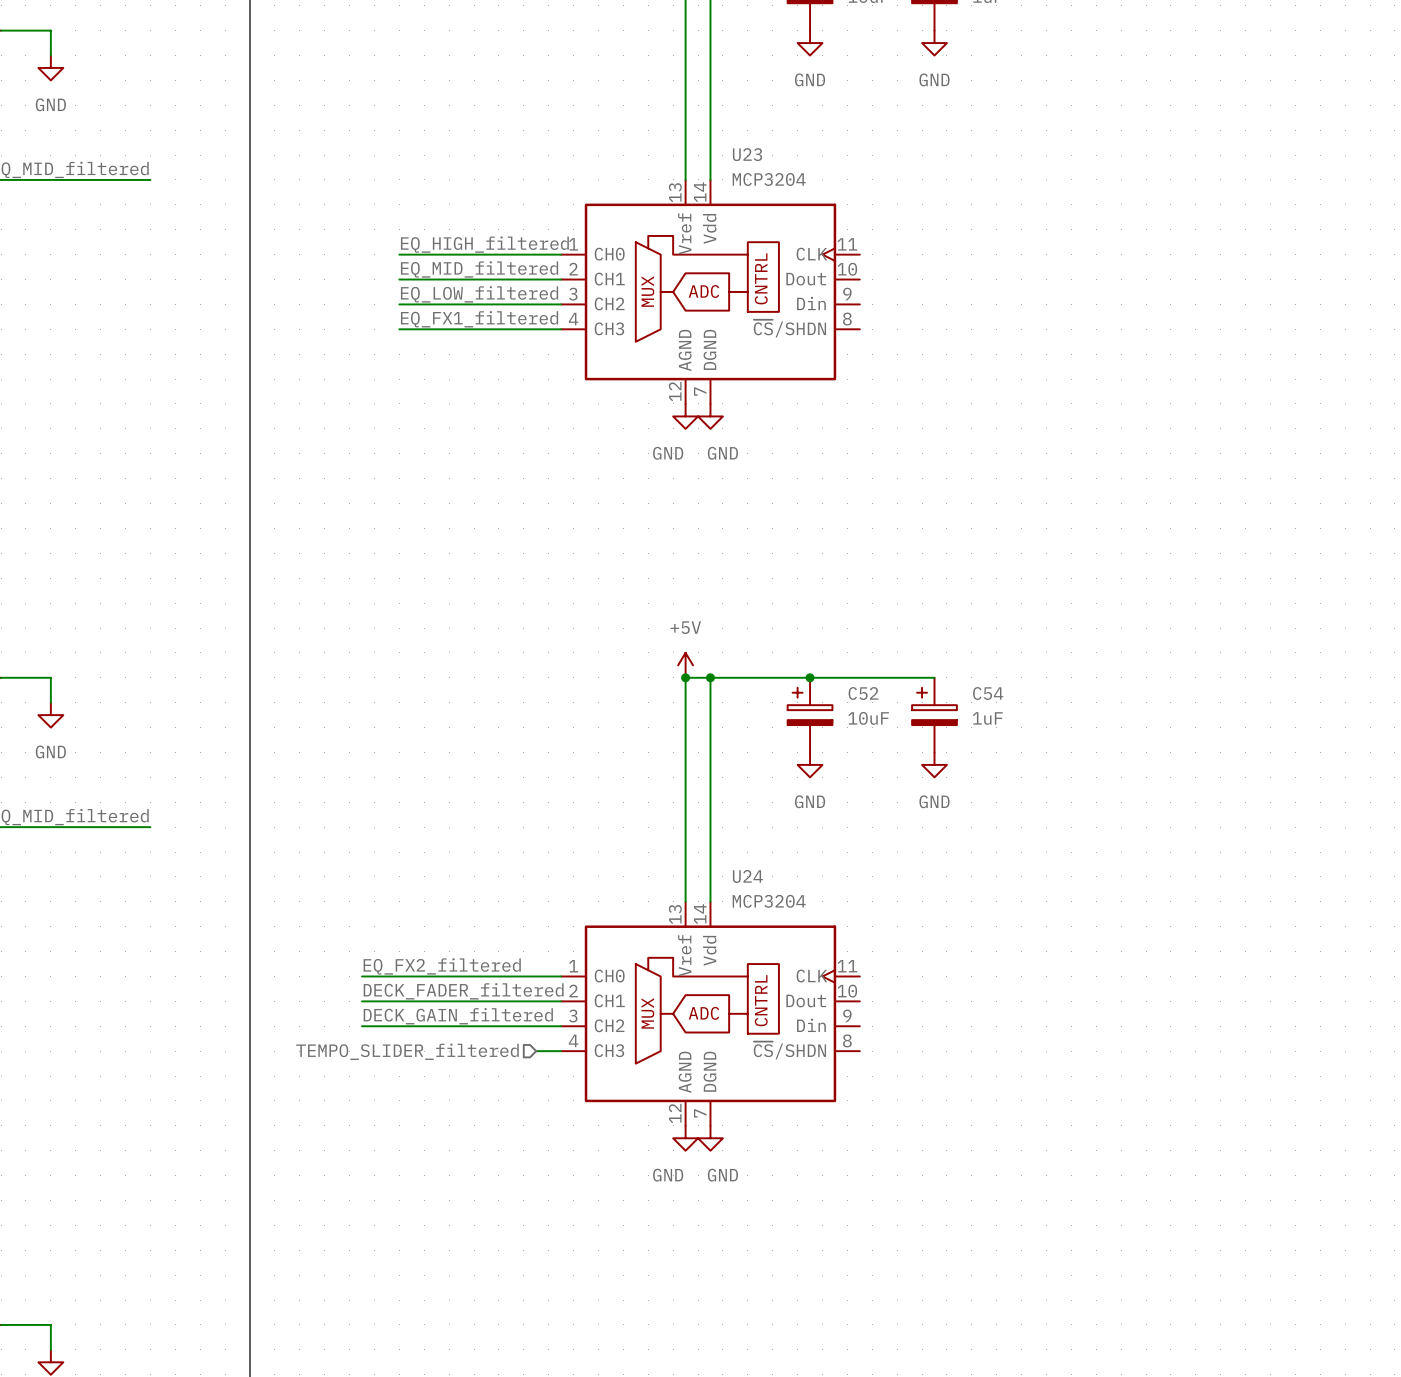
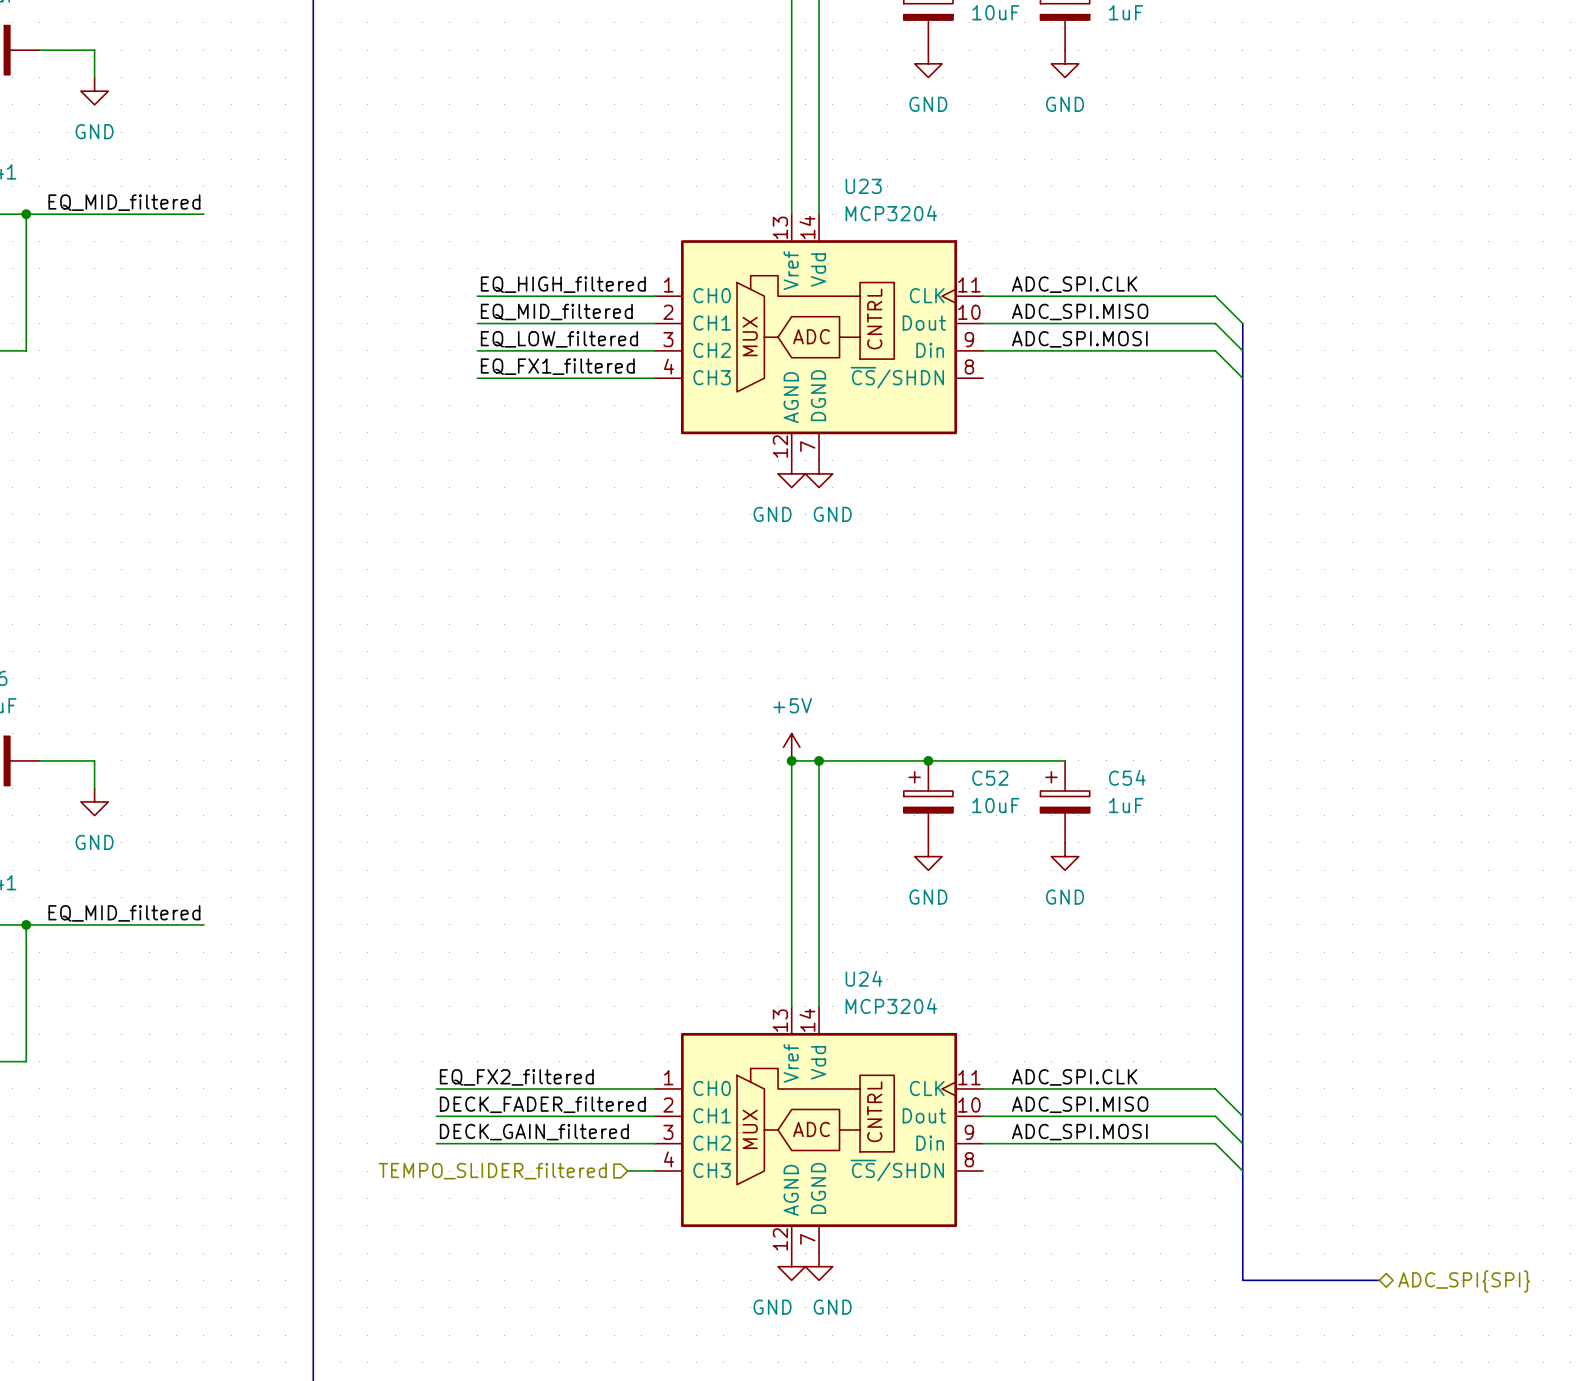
label: none -> ADC_SPI.CLK (1074, 284)
wire: none -> (983, 296) (1215, 296) (1242, 323)
label: none -> ADC_SPI.MISO (1080, 311)
wire: none -> (983, 323) (1215, 323) (1242, 350)
bus: none -> (1242, 323) (1242, 1280) (1379, 1280)
label: none -> ADC_SPI.MOSI (1079, 339)
wire: none -> (983, 350) (1215, 350) (1242, 378)
label: none -> ADC_SPI.CLK (1074, 1077)
wire: none -> (983, 1088) (1215, 1088) (1242, 1116)
label: none -> ADC_SPI.MISO (1080, 1104)
wire: none -> (983, 1116) (1215, 1116) (1242, 1143)
label: none -> ADC_SPI.MOSI (1079, 1132)
wire: none -> (983, 1143) (1215, 1143) (1242, 1171)
hierarchical label: none -> ADC_SPI{SPI} (1464, 1281)

